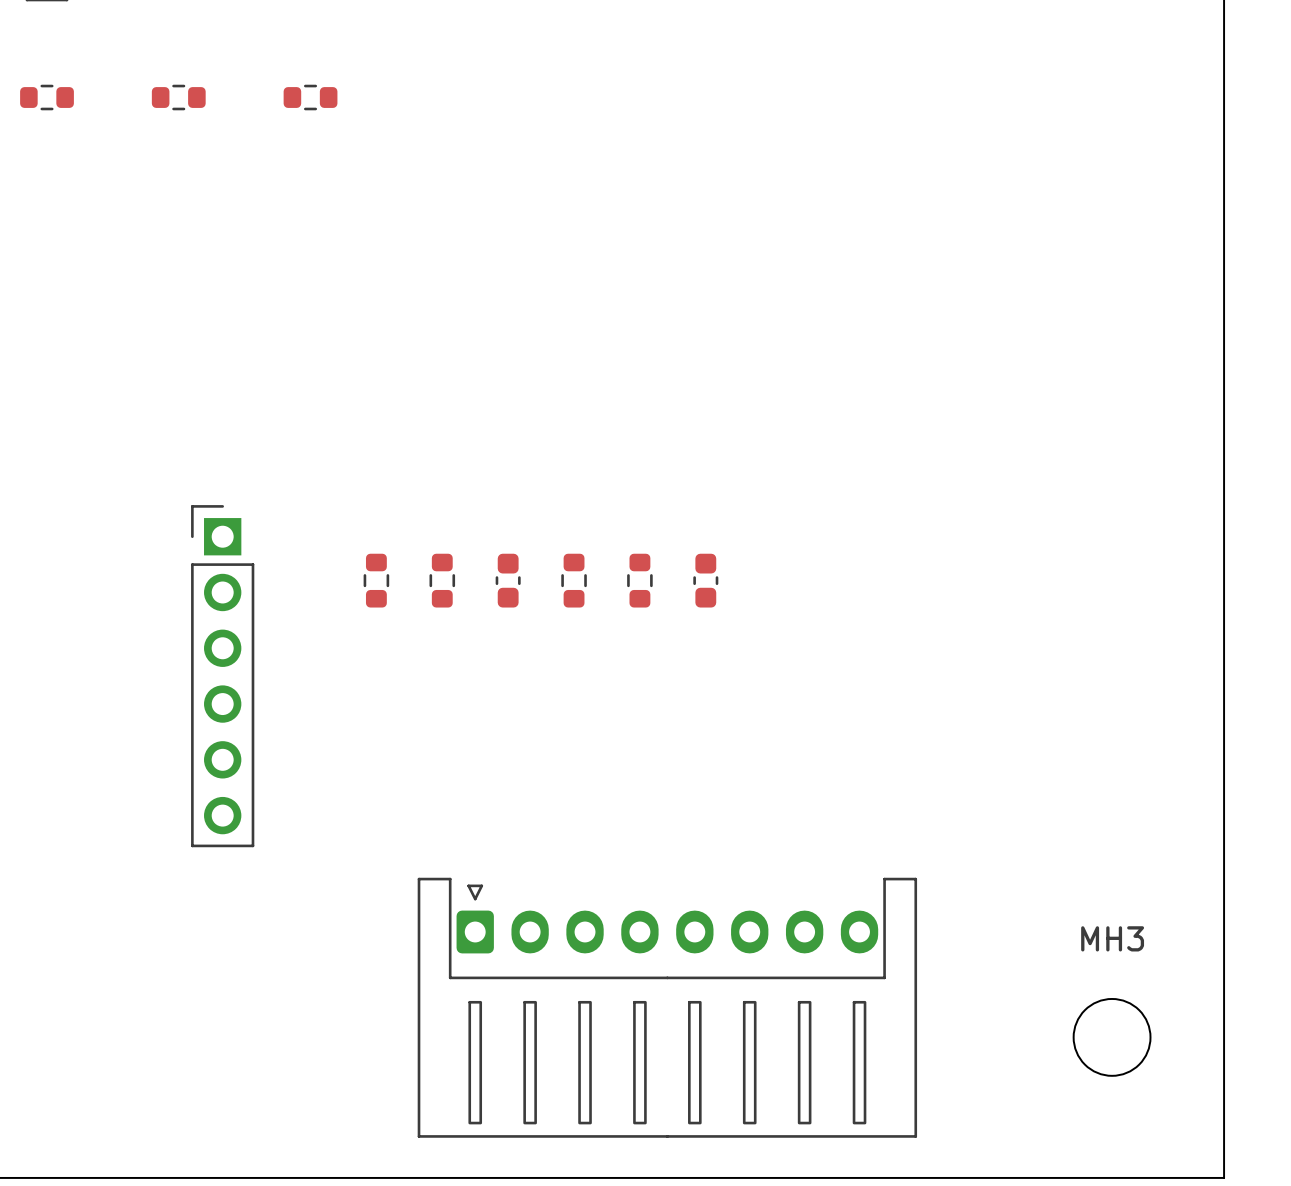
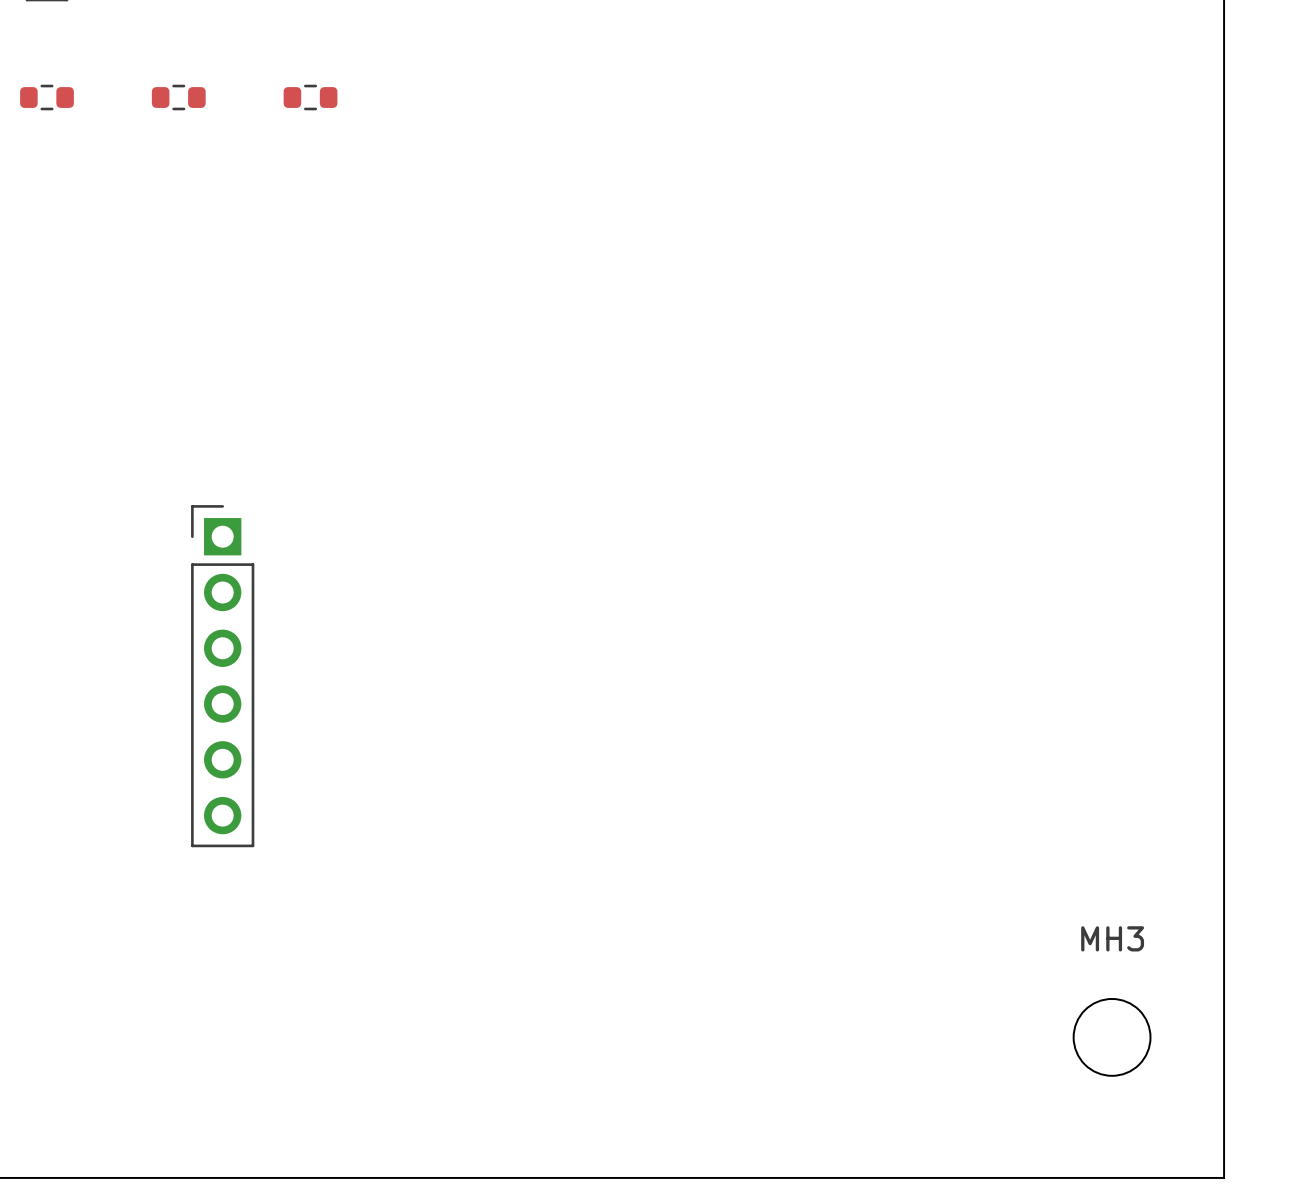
part: (376, 580) -> none
part: (442, 580) -> none
part: (508, 580) -> none
part: (574, 580) -> none
part: (639, 580) -> none
part: (705, 580) -> none
part: (667, 1007) -> none

